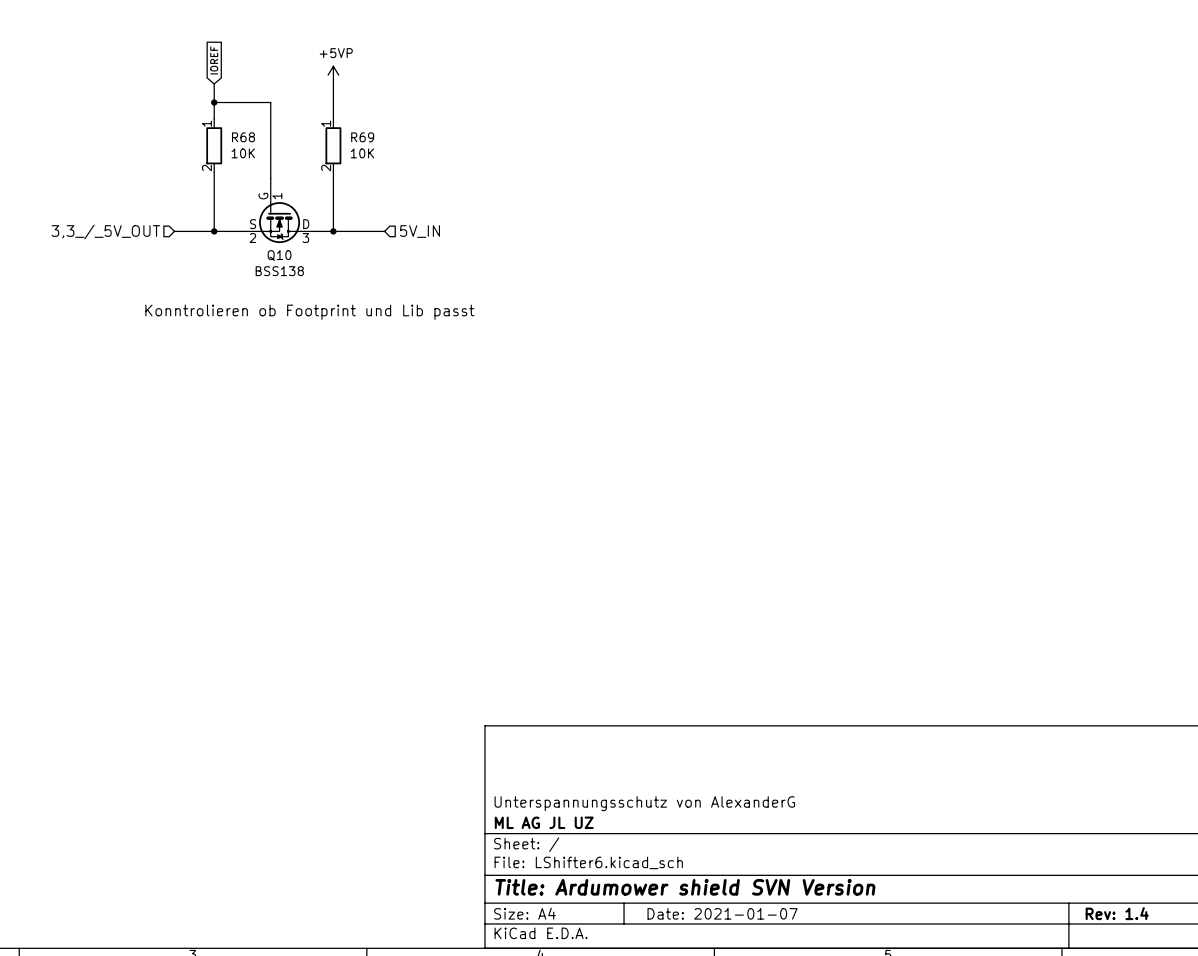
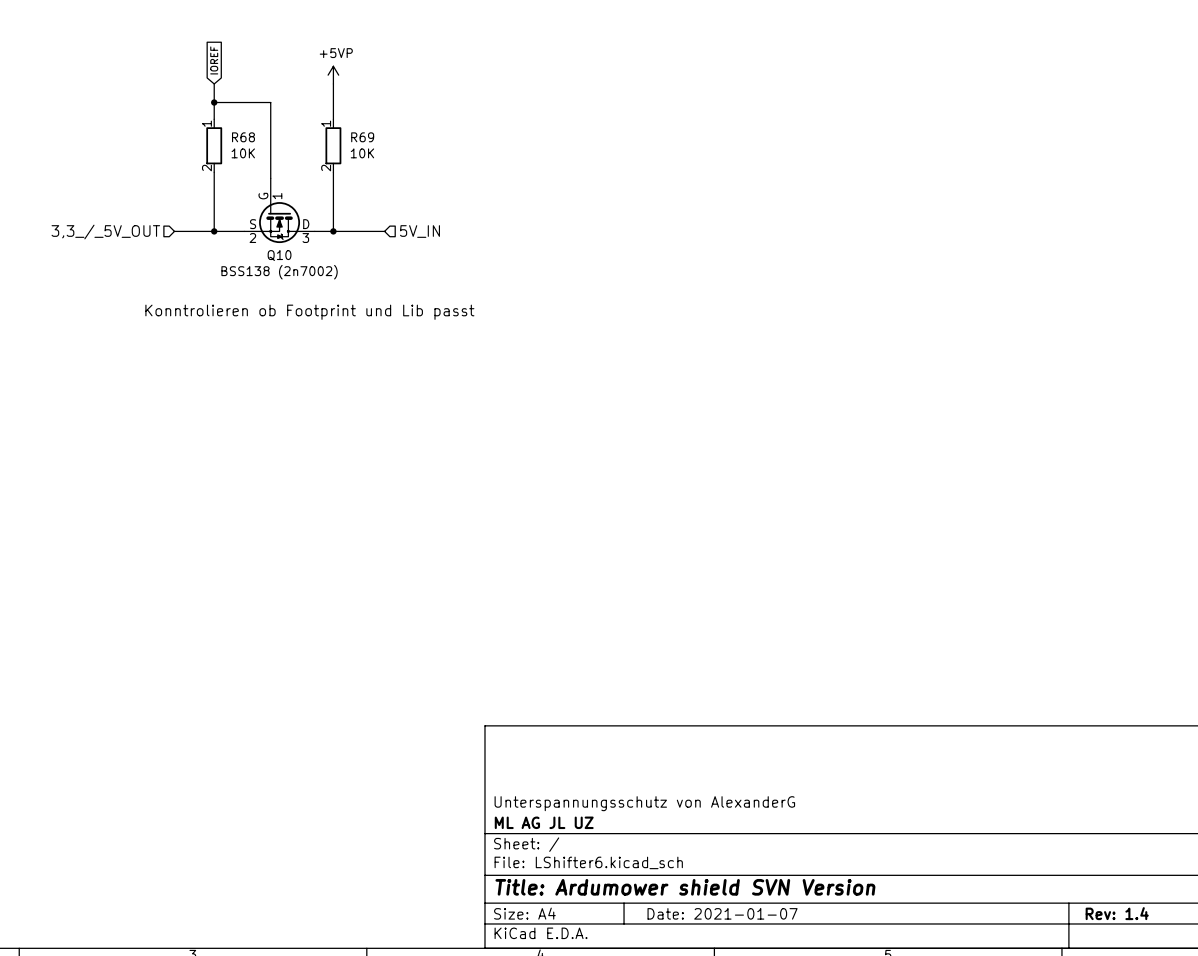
Q10 value: BSS138 (279, 271) -> BSS138 (2n7002) (279, 272)

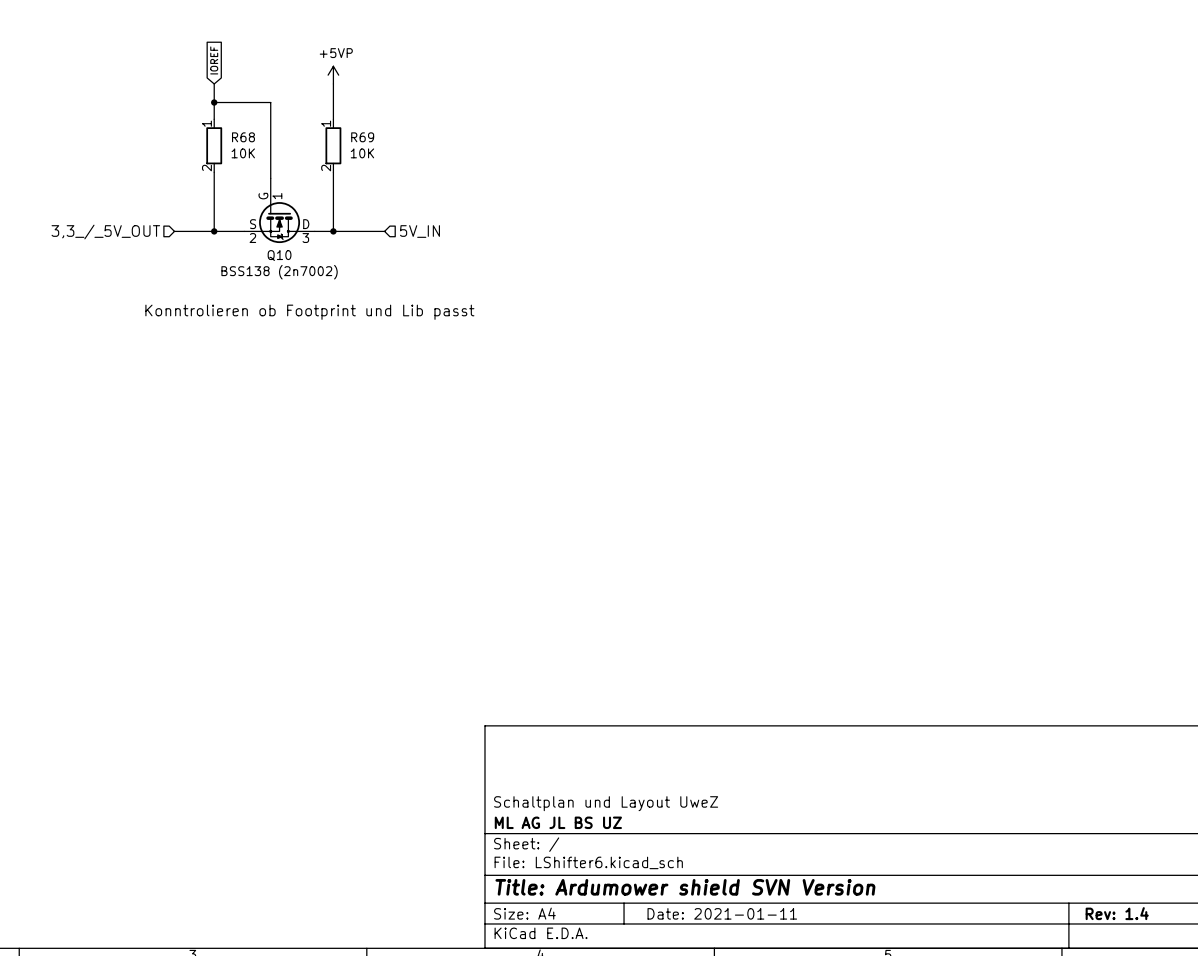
title block: Unterspannungsschutz von AlexanderG (644, 803) -> Schaltplan und Layout UweZ (606, 803)
title block: ML AG JL UZ (544, 822) -> ML AG JL BS UZ (558, 822)
title block: Date: 2021-01-07 (722, 913) -> Date: 2021-01-11 (722, 913)

